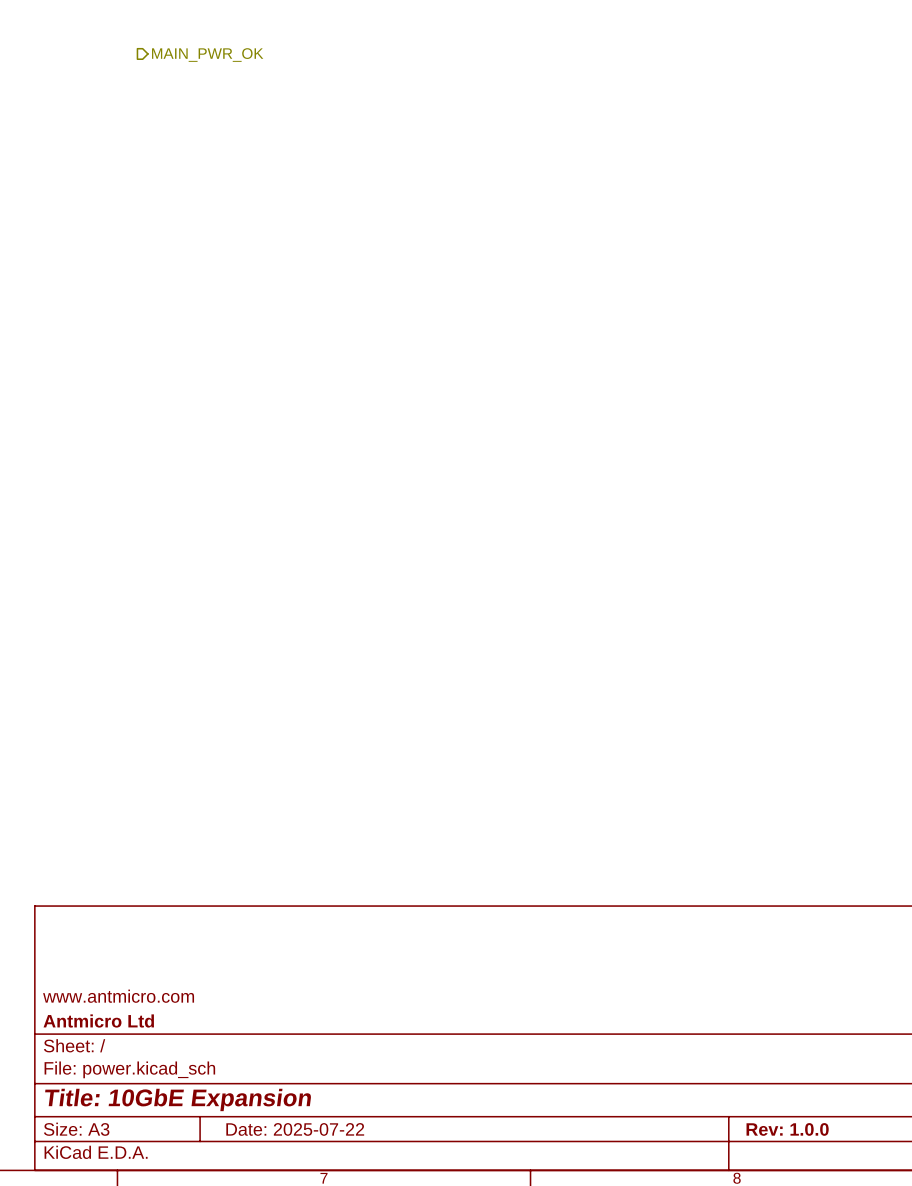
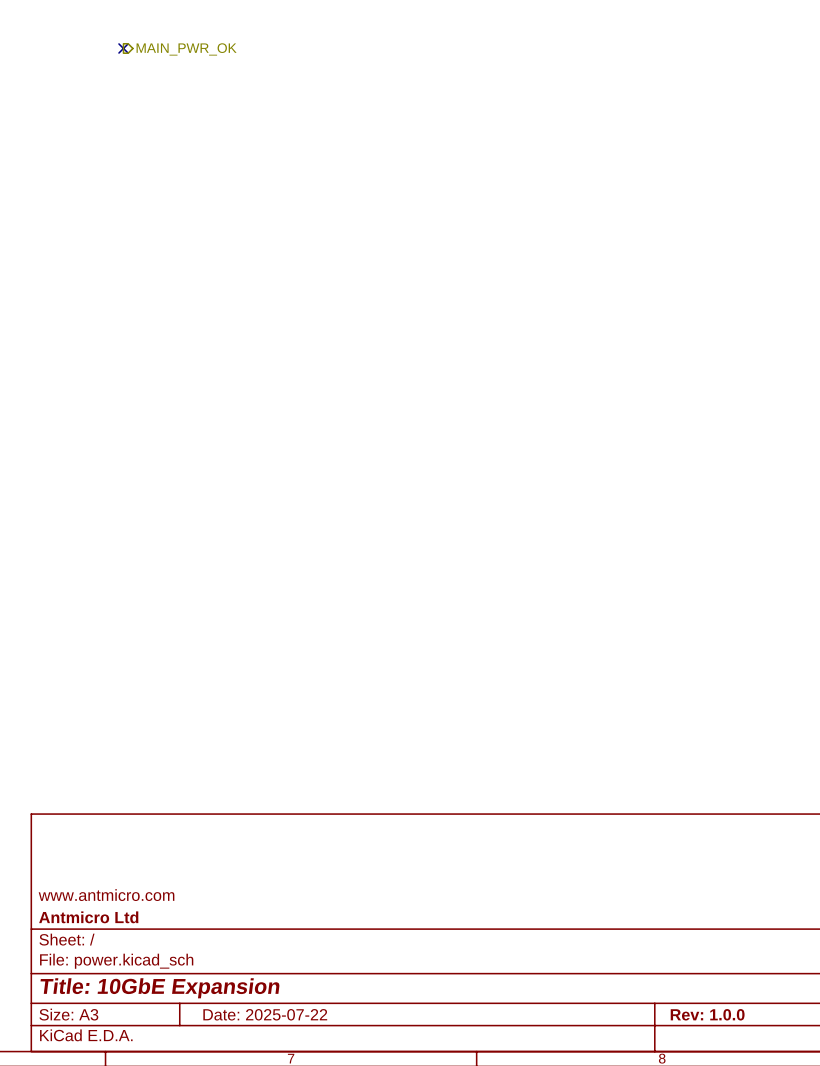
no-connect mark: none -> (123, 48)

